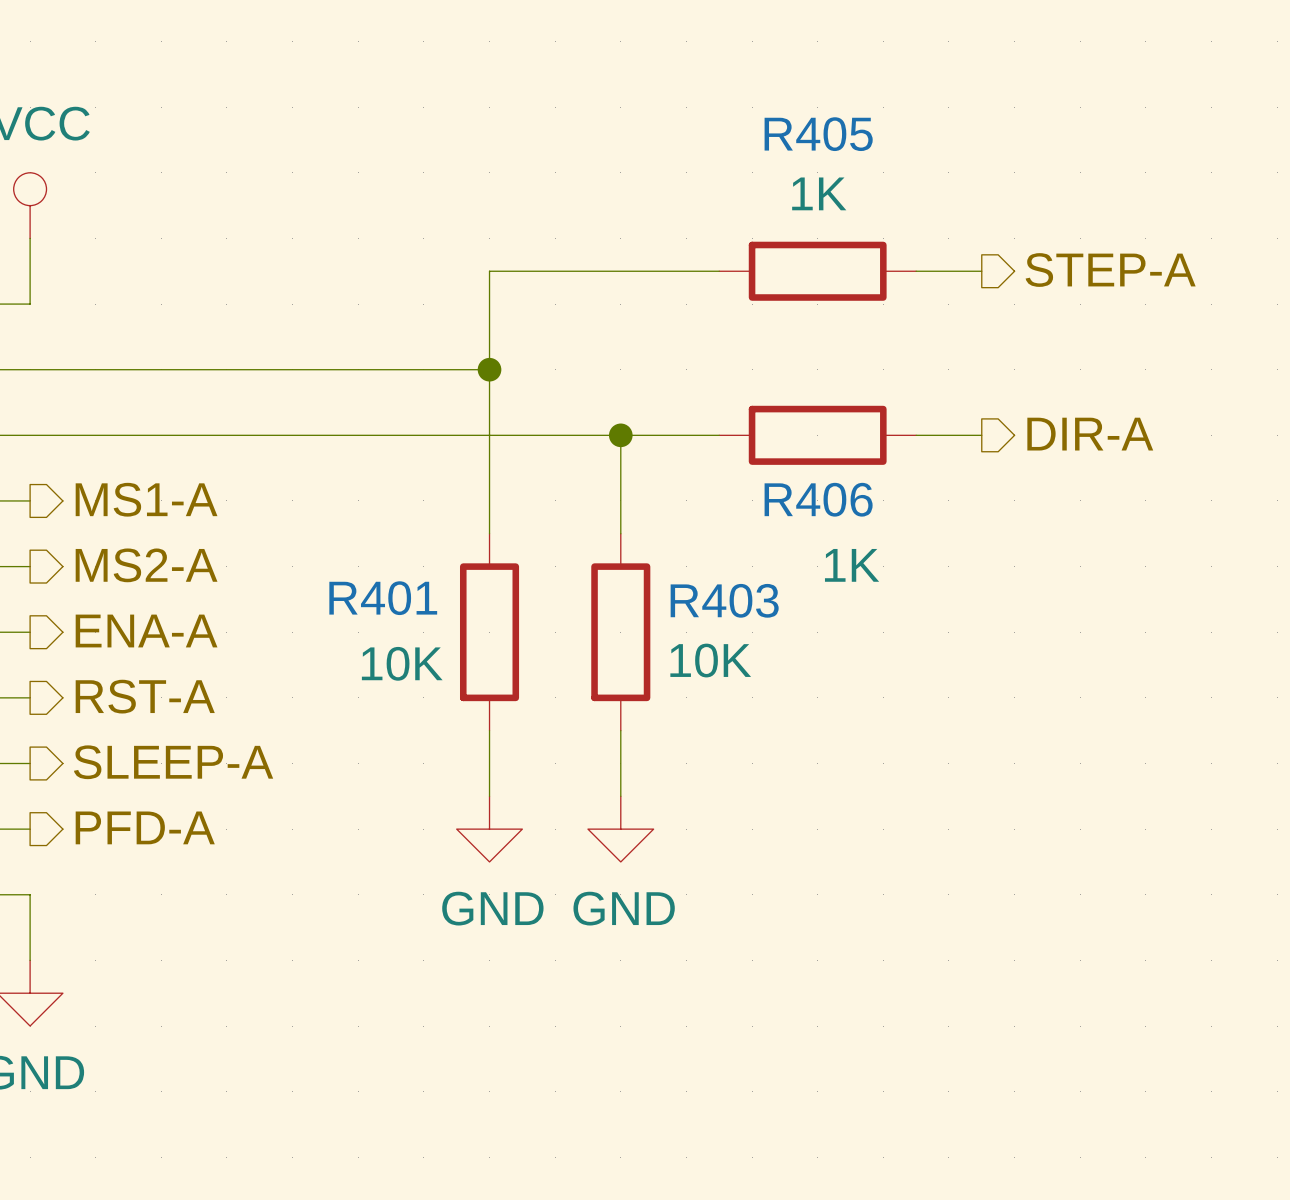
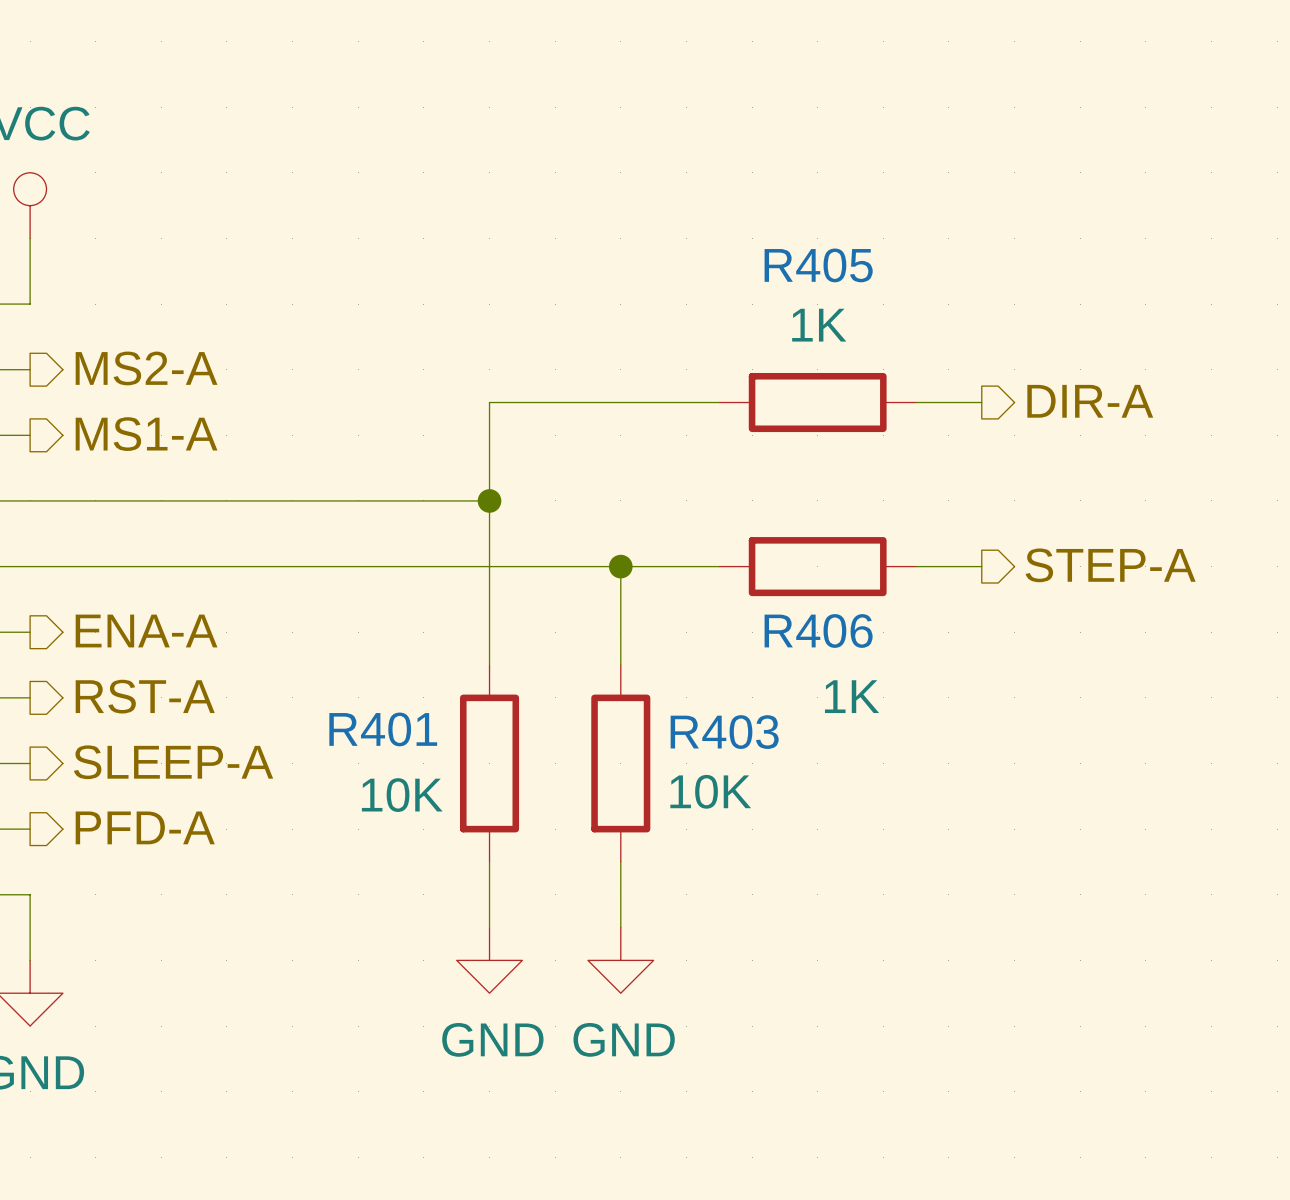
hierarchical label position: STEP-A (1110, 270) -> STEP-A (1110, 565)
wire: (719, 271) (489, 271) (489, 402) -> (719, 402) (489, 402)
R405 position: (817, 271) -> (817, 402)
wire: (916, 271) (981, 271) -> (916, 402) (981, 402)
wire: (30, 369) (489, 369) -> (30, 500) (489, 500)
junction: (489, 369) -> none
hierarchical label position: DIR-A (1090, 434) -> DIR-A (1090, 401)
wire: (30, 435) (719, 435) -> (30, 566) (719, 566)
wire: (620, 435) (620, 533) -> (620, 566) (620, 665)
junction: (620, 435) -> none
R406 position: (817, 435) -> (817, 566)
wire: (916, 435) (981, 435) -> (916, 566) (981, 566)
hierarchical label position: MS1-A (146, 499) -> MS1-A (146, 434)
junction: none -> (489, 500)
wire: none -> (489, 533) (489, 665)
hierarchical label position: MS2-A (146, 565) -> MS2-A (146, 368)
junction: none -> (620, 566)
R401 position: (489, 632) -> (489, 763)
R403 position: (620, 632) -> (620, 763)
wire: (489, 730) (489, 796) -> (489, 861) (489, 927)
wire: (620, 730) (620, 796) -> (620, 861) (620, 927)
power symbol: GND (489, 829) -> none
power symbol: GND (620, 829) -> none
power symbol: none -> GND (489, 960)
power symbol: none -> GND (620, 960)

